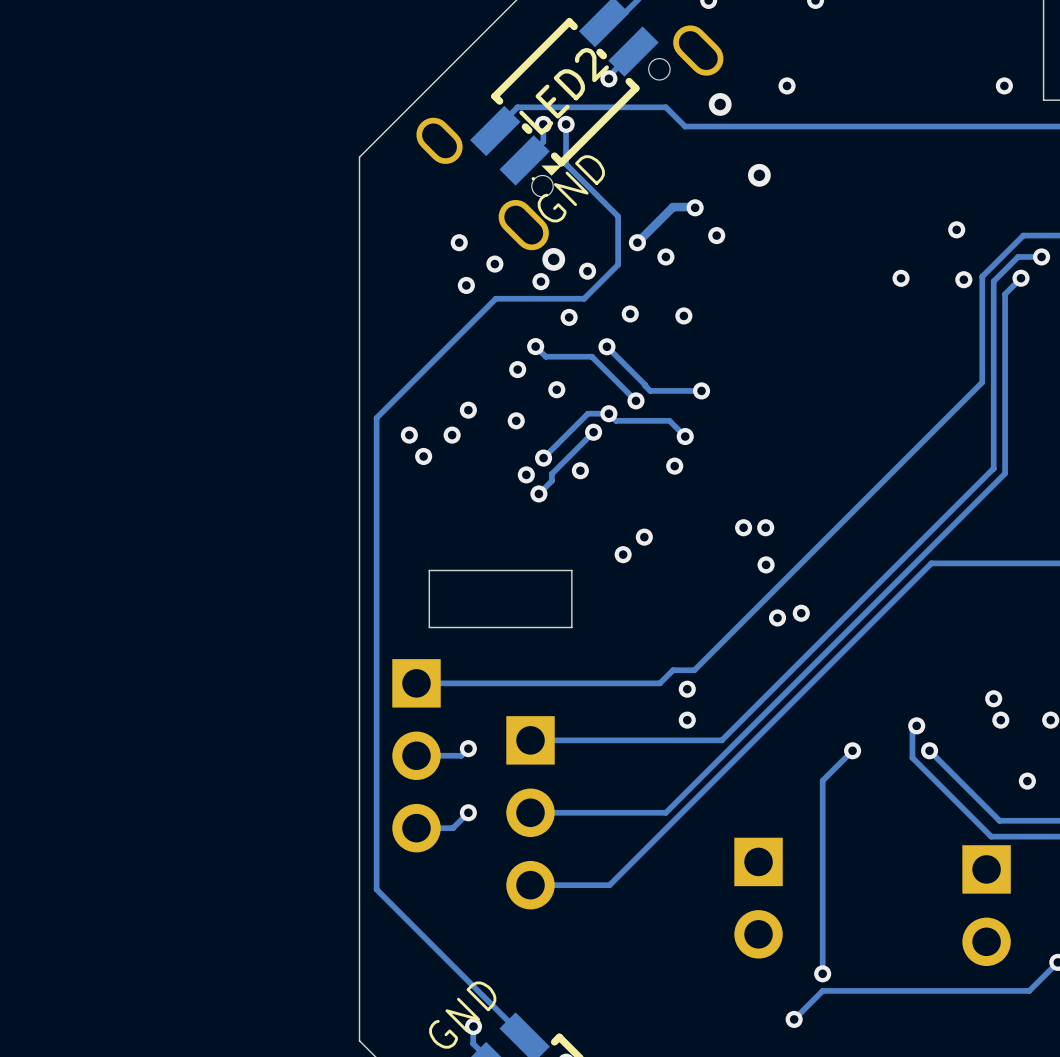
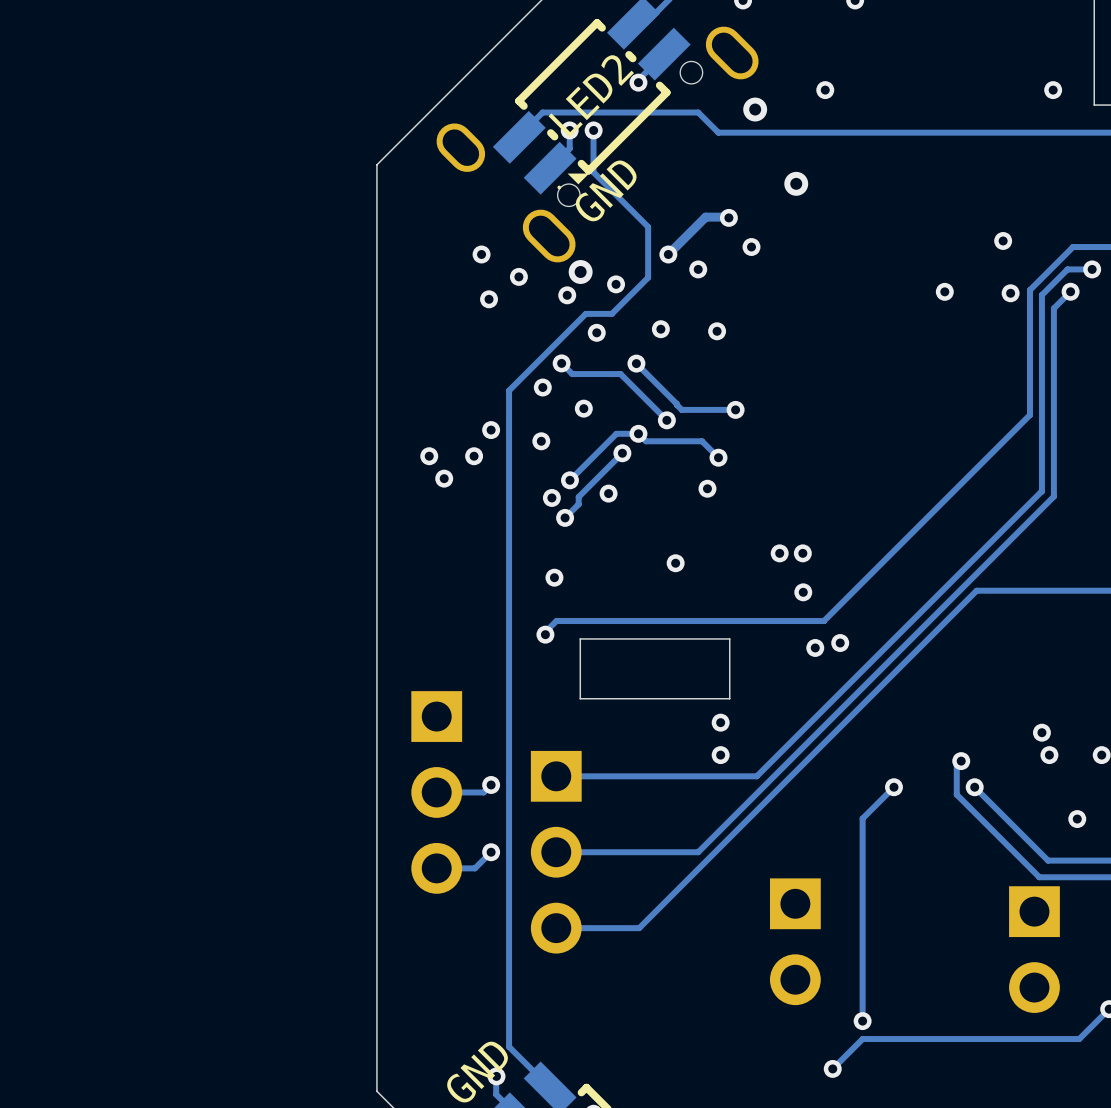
track: (584, 298) (495, 298) (376, 417) (376, 889) (485, 998) -> (612, 313) (585, 313) (509, 390) (509, 1046)
track: (982, 382) (694, 670) (673, 670) (659, 683) (416, 683) -> (1029, 400) (1029, 415) (823, 621) (556, 621) (545, 632) (545, 634)
via: none -> (554, 577)
via: (623, 554) -> none
board edge: (571, 570) (571, 627) (429, 627) (429, 570) (571, 570) -> (729, 638) (729, 698) (580, 698) (580, 638) (729, 638)
via: none -> (545, 634)

